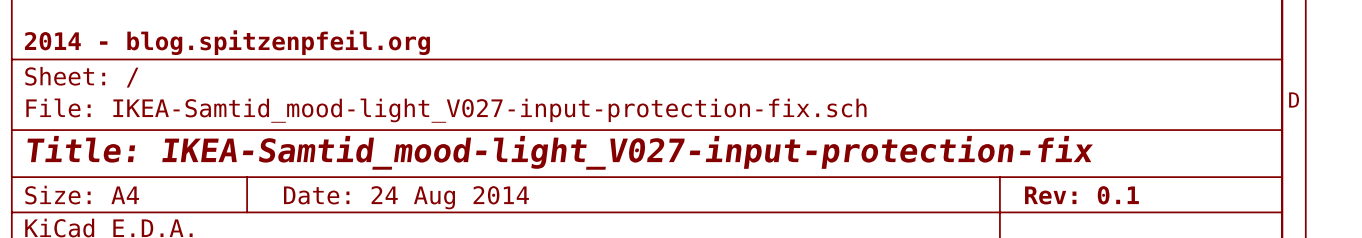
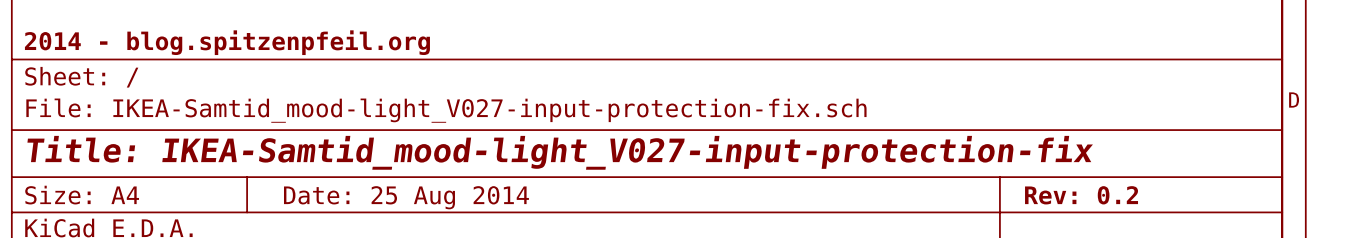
title block: Rev: 0.1 (1081, 195) -> Rev: 0.2 (1081, 195)
title block: Date: 24 Aug 2014 (406, 197) -> Date: 25 Aug 2014 (406, 197)

